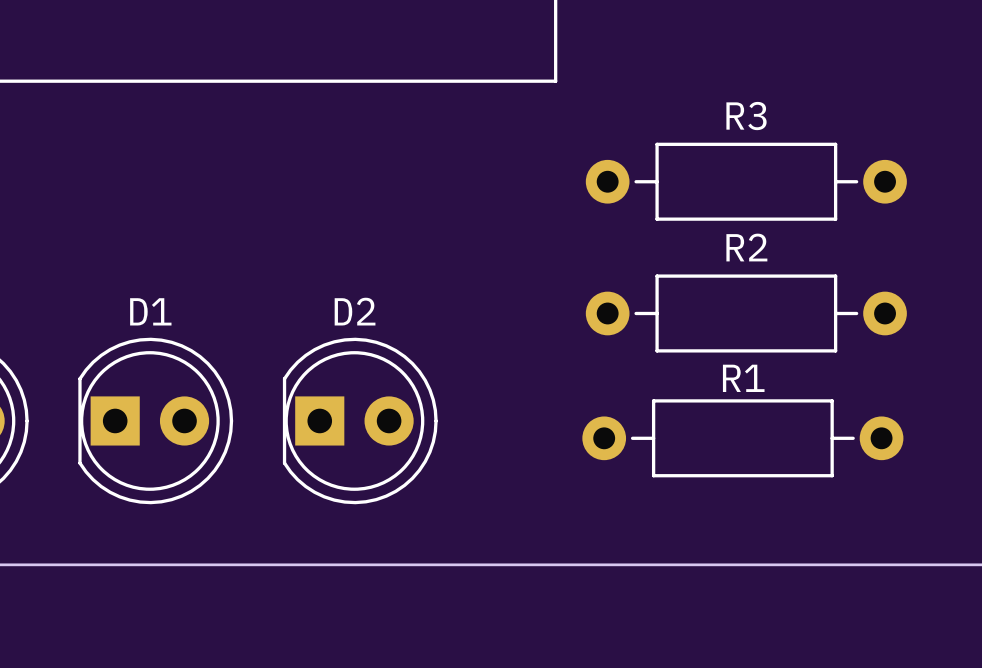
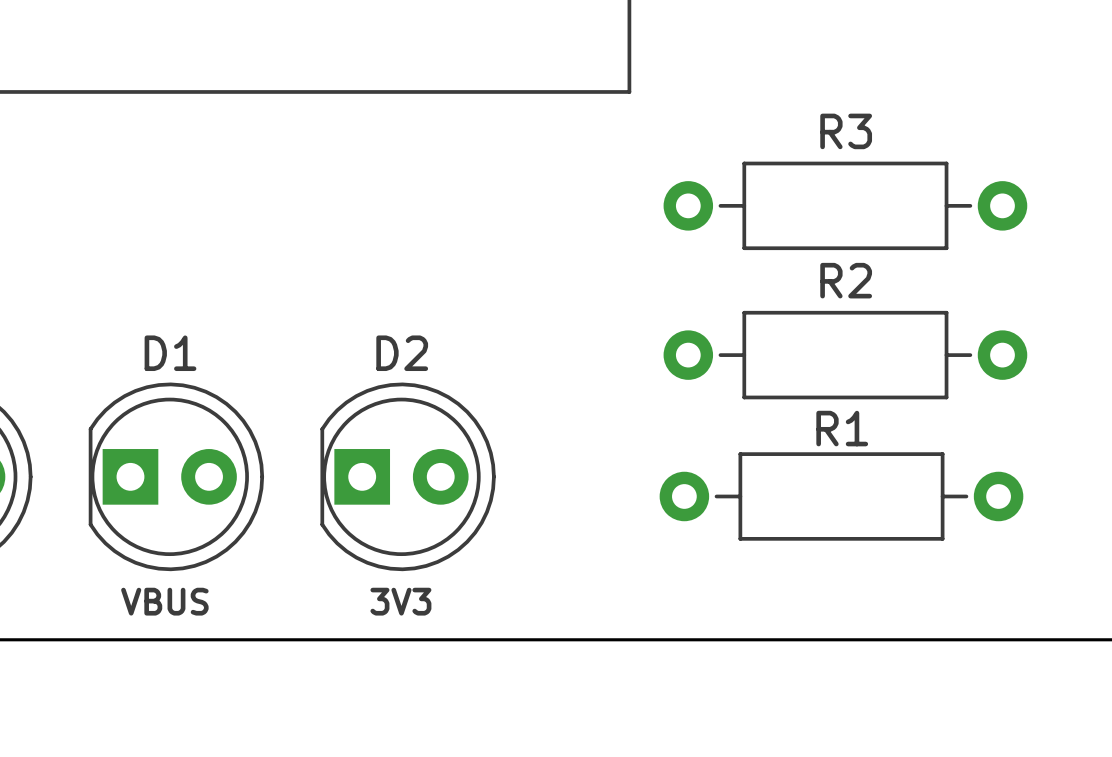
D1 text: none -> VBUS (164, 601)
D2 text: none -> 3V3 (400, 601)

